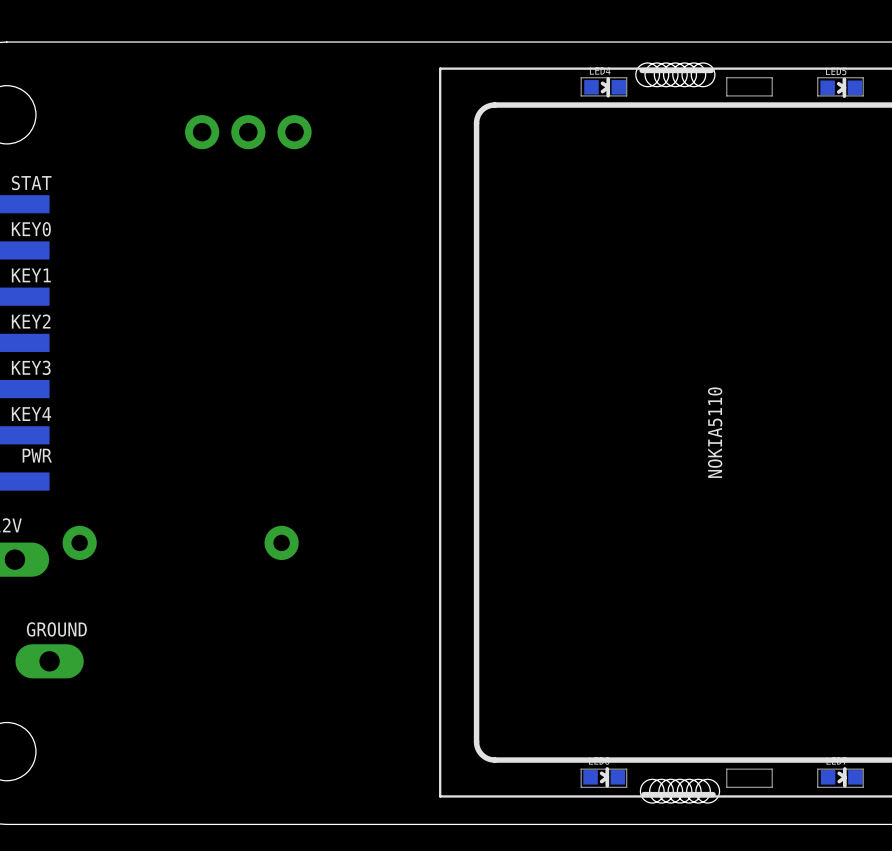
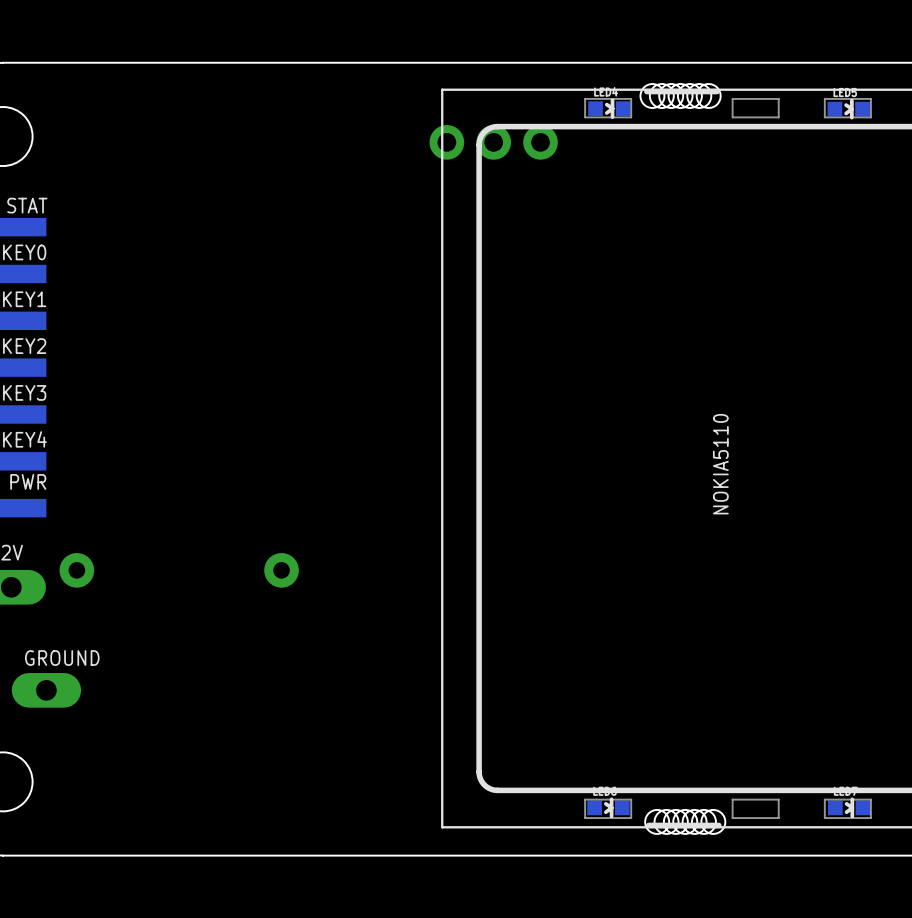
part position: (248, 132) -> (493, 142)

